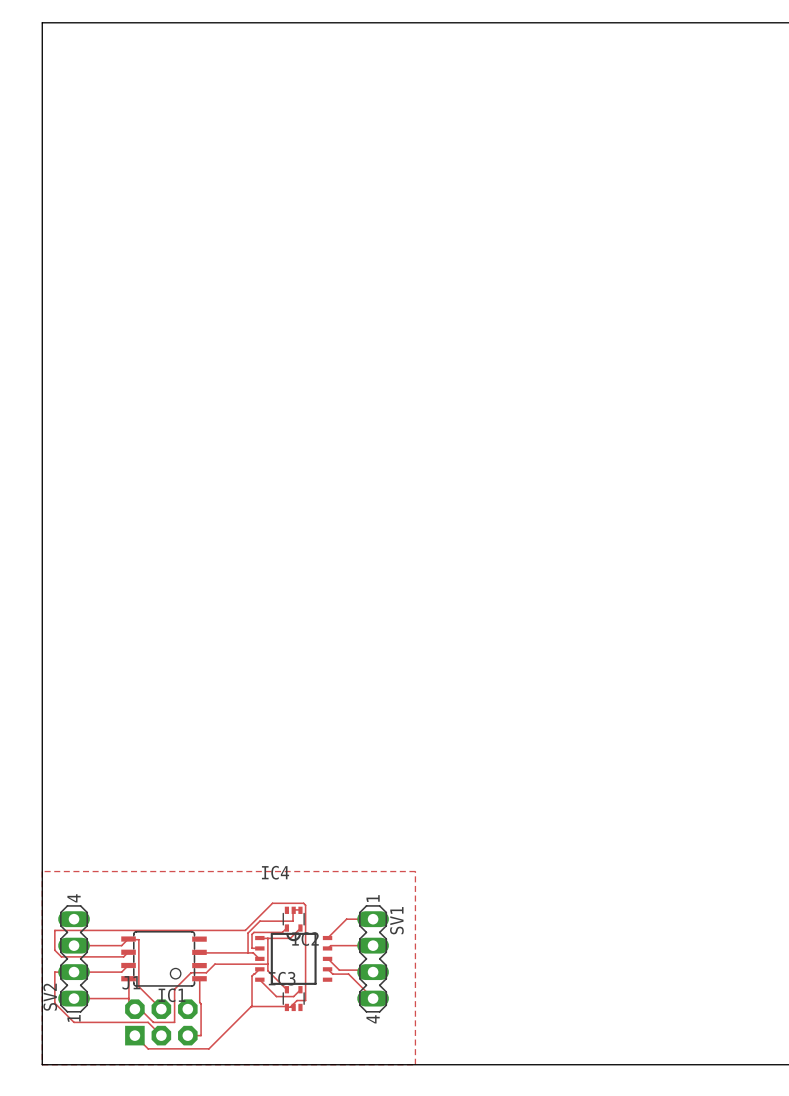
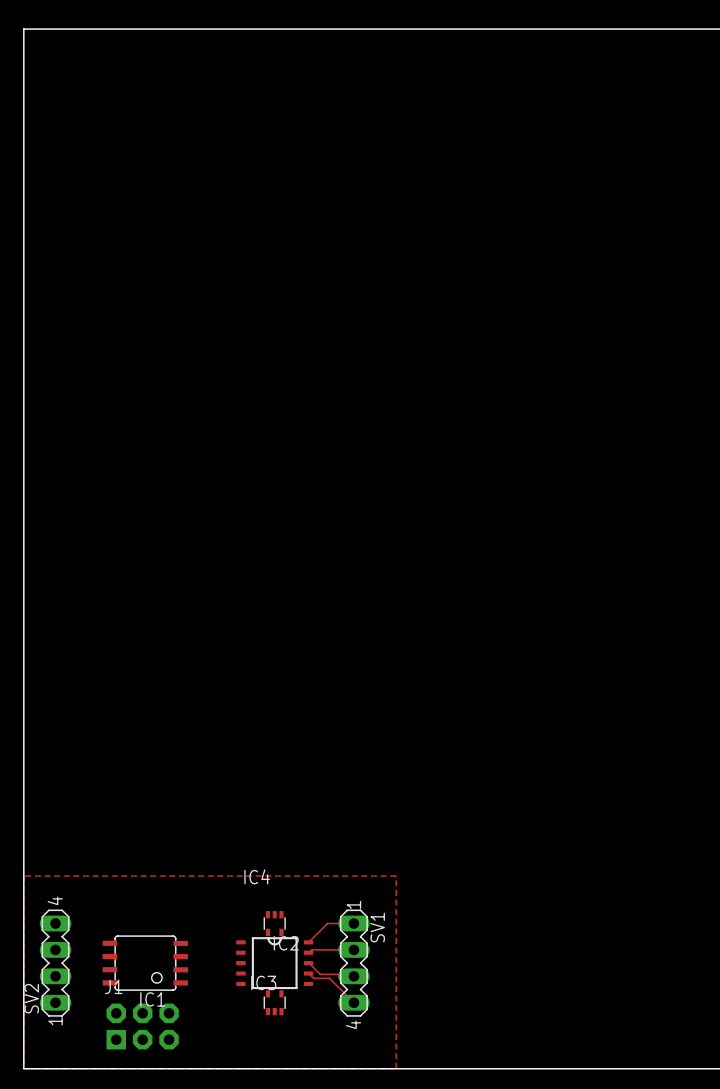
top track: (300, 910) (293, 910) (293, 921) (259, 921) (248, 933) (248, 952) -> none
top track: (286, 928) (282, 932) (253, 932) (252, 934) (252, 948) (259, 948) -> none
top track: (300, 928) (290, 938) (259, 938) -> none
top track: (267, 938) (267, 970) (286, 989) -> none
top track: (74, 945) (121, 945) (128, 939) (138, 939) (138, 986) (161, 1009) -> none
top track: (128, 952) (123, 956) (61, 956) (54, 950) (54, 930) (245, 930) (272, 903) (303, 903) (305, 905) (305, 1000) (297, 1000) (291, 1007) -> none
top track: (199, 952) (253, 952) (259, 958) -> none
top track: (267, 964) (214, 964) (206, 972) (191, 972) (174, 989) (174, 1022) (153, 1022) (140, 1009) (128, 1009) (128, 978) -> none
top track: (128, 965) (121, 972) (54, 972) (54, 1003) (74, 1022) (148, 1022) (161, 1035) -> none
top track: (259, 969) (252, 976) (252, 1006) -> none
top track: (199, 978) (201, 1035) (187, 1035) -> none
top track: (259, 979) (276, 996) (293, 996) (300, 989) -> none
top track: (74, 998) (128, 998) -> none
top track: (293, 1007) (251, 1006) (209, 1048) (148, 1048) (134, 1035) -> none

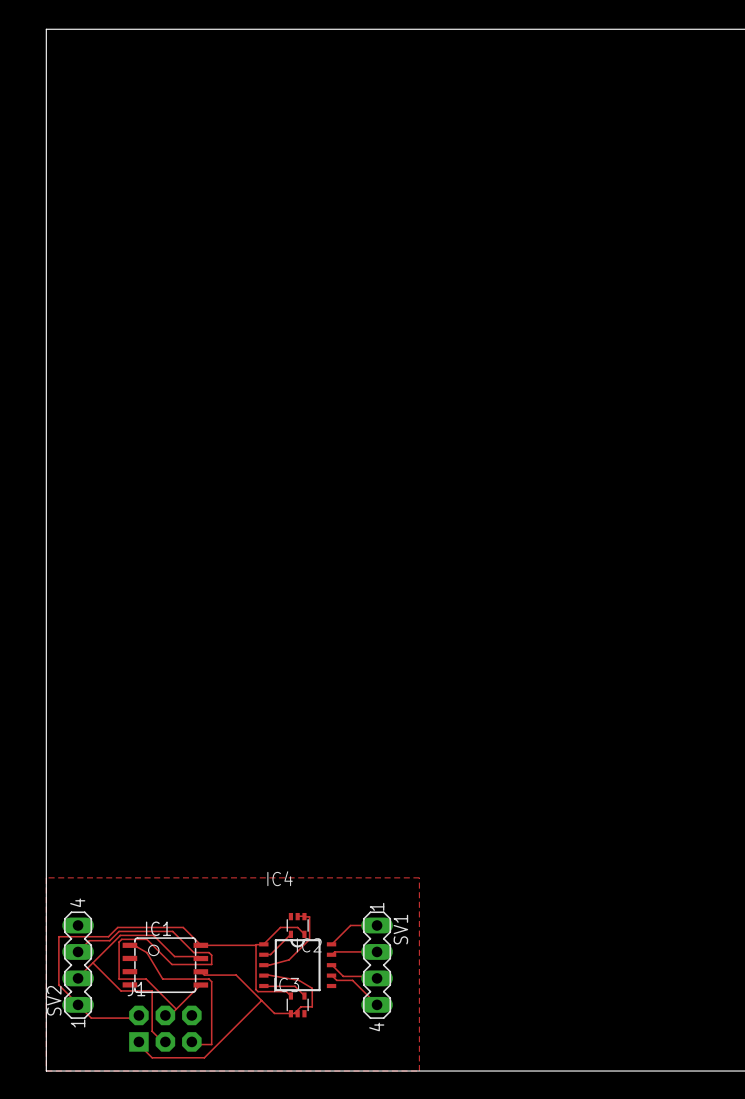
top track: none -> (297, 916) (309, 916) (309, 939) (289, 959) (263, 965)
top track: none -> (290, 934) (270, 954) (263, 954)
top track: none -> (304, 934) (297, 927) (280, 927) (263, 944) (256, 944) (256, 989) (258, 991) (286, 991) (290, 996)
top track: none -> (129, 945) (146, 952) (162, 979) (209, 979) (211, 981) (211, 1044) (191, 1044)
top track: none -> (256, 945) (200, 945) (183, 927) (117, 927) (108, 936) (58, 936) (58, 985) (78, 1004) (91, 1018) (138, 1018)
top track: none -> (78, 951) (89, 940) (109, 940) (119, 931) (172, 931) (193, 952) (209, 952) (211, 955) (211, 964) (172, 964) (146, 939) (121, 939) (119, 942) (119, 979) (146, 979) (176, 1009)
top track: none -> (200, 958) (198, 956) (174, 956) (153, 935) (120, 935) (78, 978)
top track: none -> (92, 962) (121, 990) (152, 990) (152, 1031) (165, 1044)
IC1 rotation: 0° (145, 963) -> 180° (165, 965)
top track: none -> (200, 971) (204, 975) (236, 975) (274, 1013) (297, 1013)
top track: none -> (263, 975) (299, 980) (312, 988) (312, 1006) (301, 1006) (295, 1013)
top track: none -> (200, 985) (165, 1018)
top track: none -> (263, 986) (295, 986) (304, 996)
top track: none -> (261, 1000) (204, 1057) (152, 1057) (138, 1044)

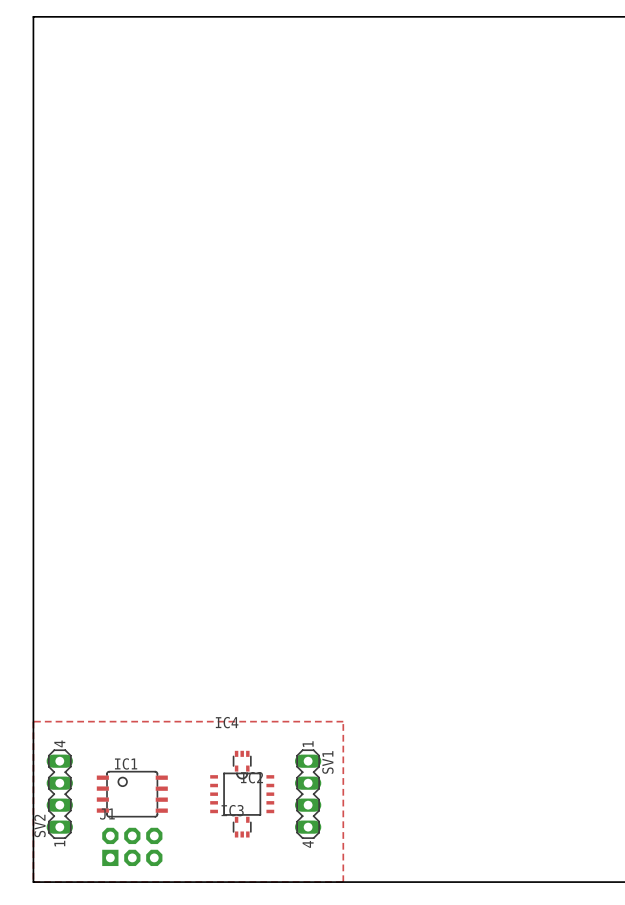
top track: (297, 916) (309, 916) (309, 939) (289, 959) (263, 965) -> none
top track: (377, 925) (350, 925) (331, 944) -> none
top track: (290, 934) (270, 954) (263, 954) -> none
top track: (304, 934) (297, 927) (280, 927) (263, 944) (256, 944) (256, 989) (258, 991) (286, 991) (290, 996) -> none
top track: (129, 945) (146, 952) (162, 979) (209, 979) (211, 981) (211, 1044) (191, 1044) -> none
top track: (256, 945) (200, 945) (183, 927) (117, 927) (108, 936) (58, 936) (58, 985) (78, 1004) (91, 1018) (138, 1018) -> none
top track: (78, 951) (89, 940) (109, 940) (119, 931) (172, 931) (193, 952) (209, 952) (211, 955) (211, 964) (172, 964) (146, 939) (121, 939) (119, 942) (119, 979) (146, 979) (176, 1009) -> none
top track: (377, 951) (334, 951) (331, 954) -> none
top track: (200, 958) (198, 956) (174, 956) (153, 935) (120, 935) (78, 978) -> none
top track: (92, 962) (121, 990) (152, 990) (152, 1031) (165, 1044) -> none
top track: (331, 965) (343, 976) (375, 976) (377, 978) -> none
top track: (200, 971) (204, 975) (236, 975) (274, 1013) (297, 1013) -> none
top track: (263, 975) (299, 980) (312, 988) (312, 1006) (301, 1006) (295, 1013) -> none
top track: (331, 975) (336, 980) (352, 980) (377, 1004) -> none
top track: (200, 985) (165, 1018) -> none
top track: (263, 986) (295, 986) (304, 996) -> none
top track: (261, 1000) (204, 1057) (152, 1057) (138, 1044) -> none

